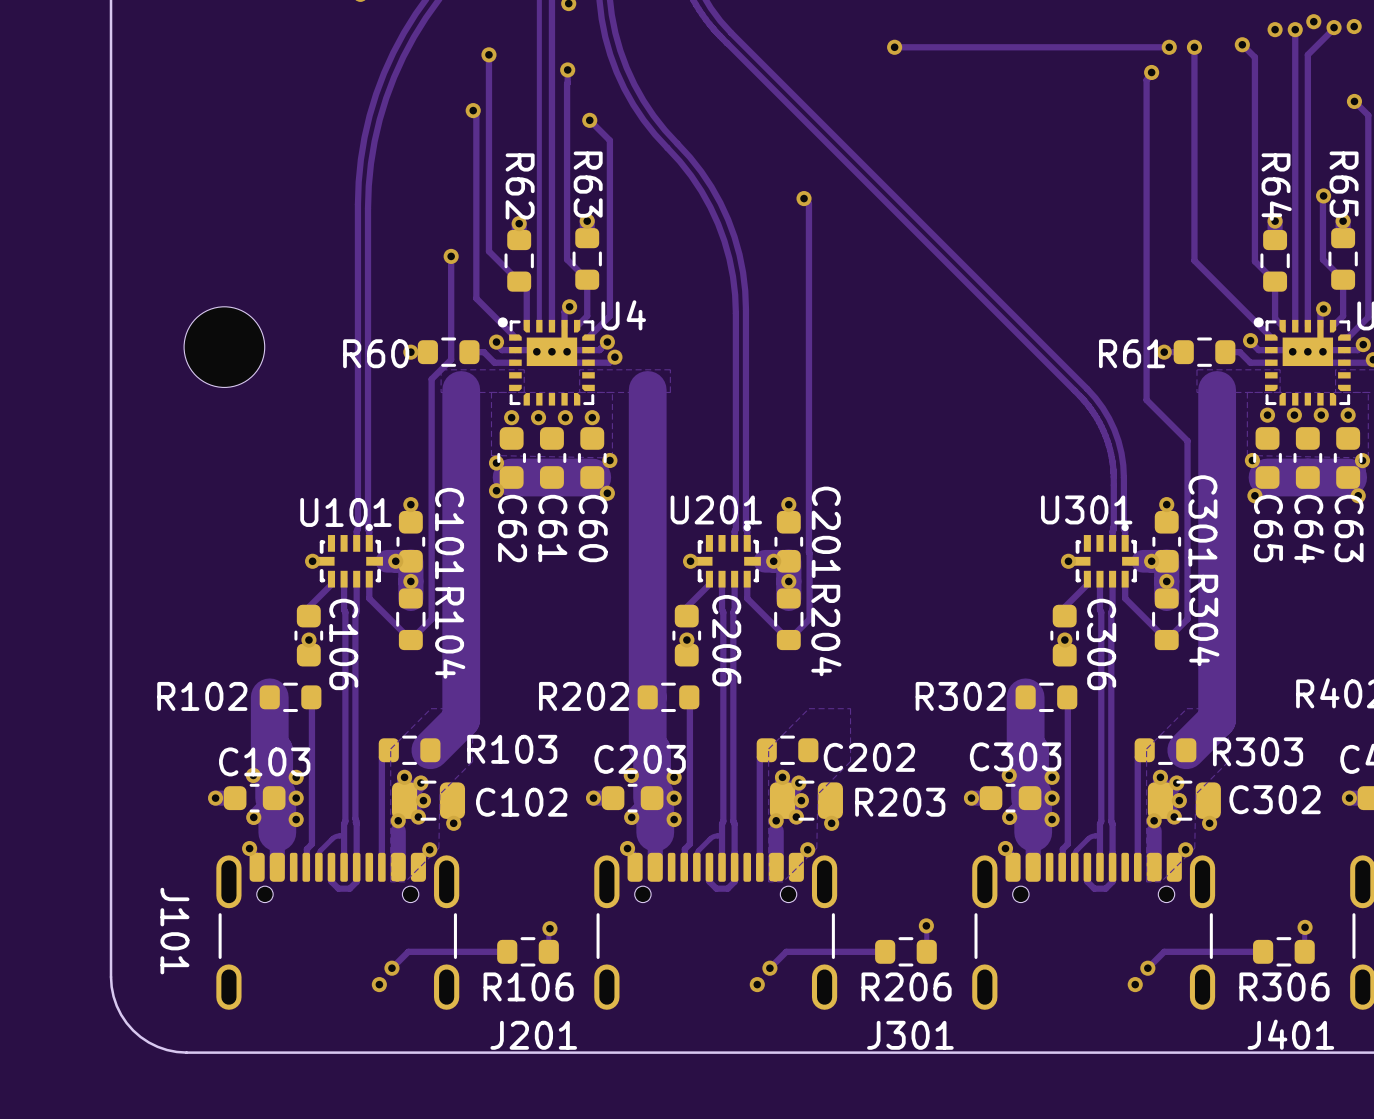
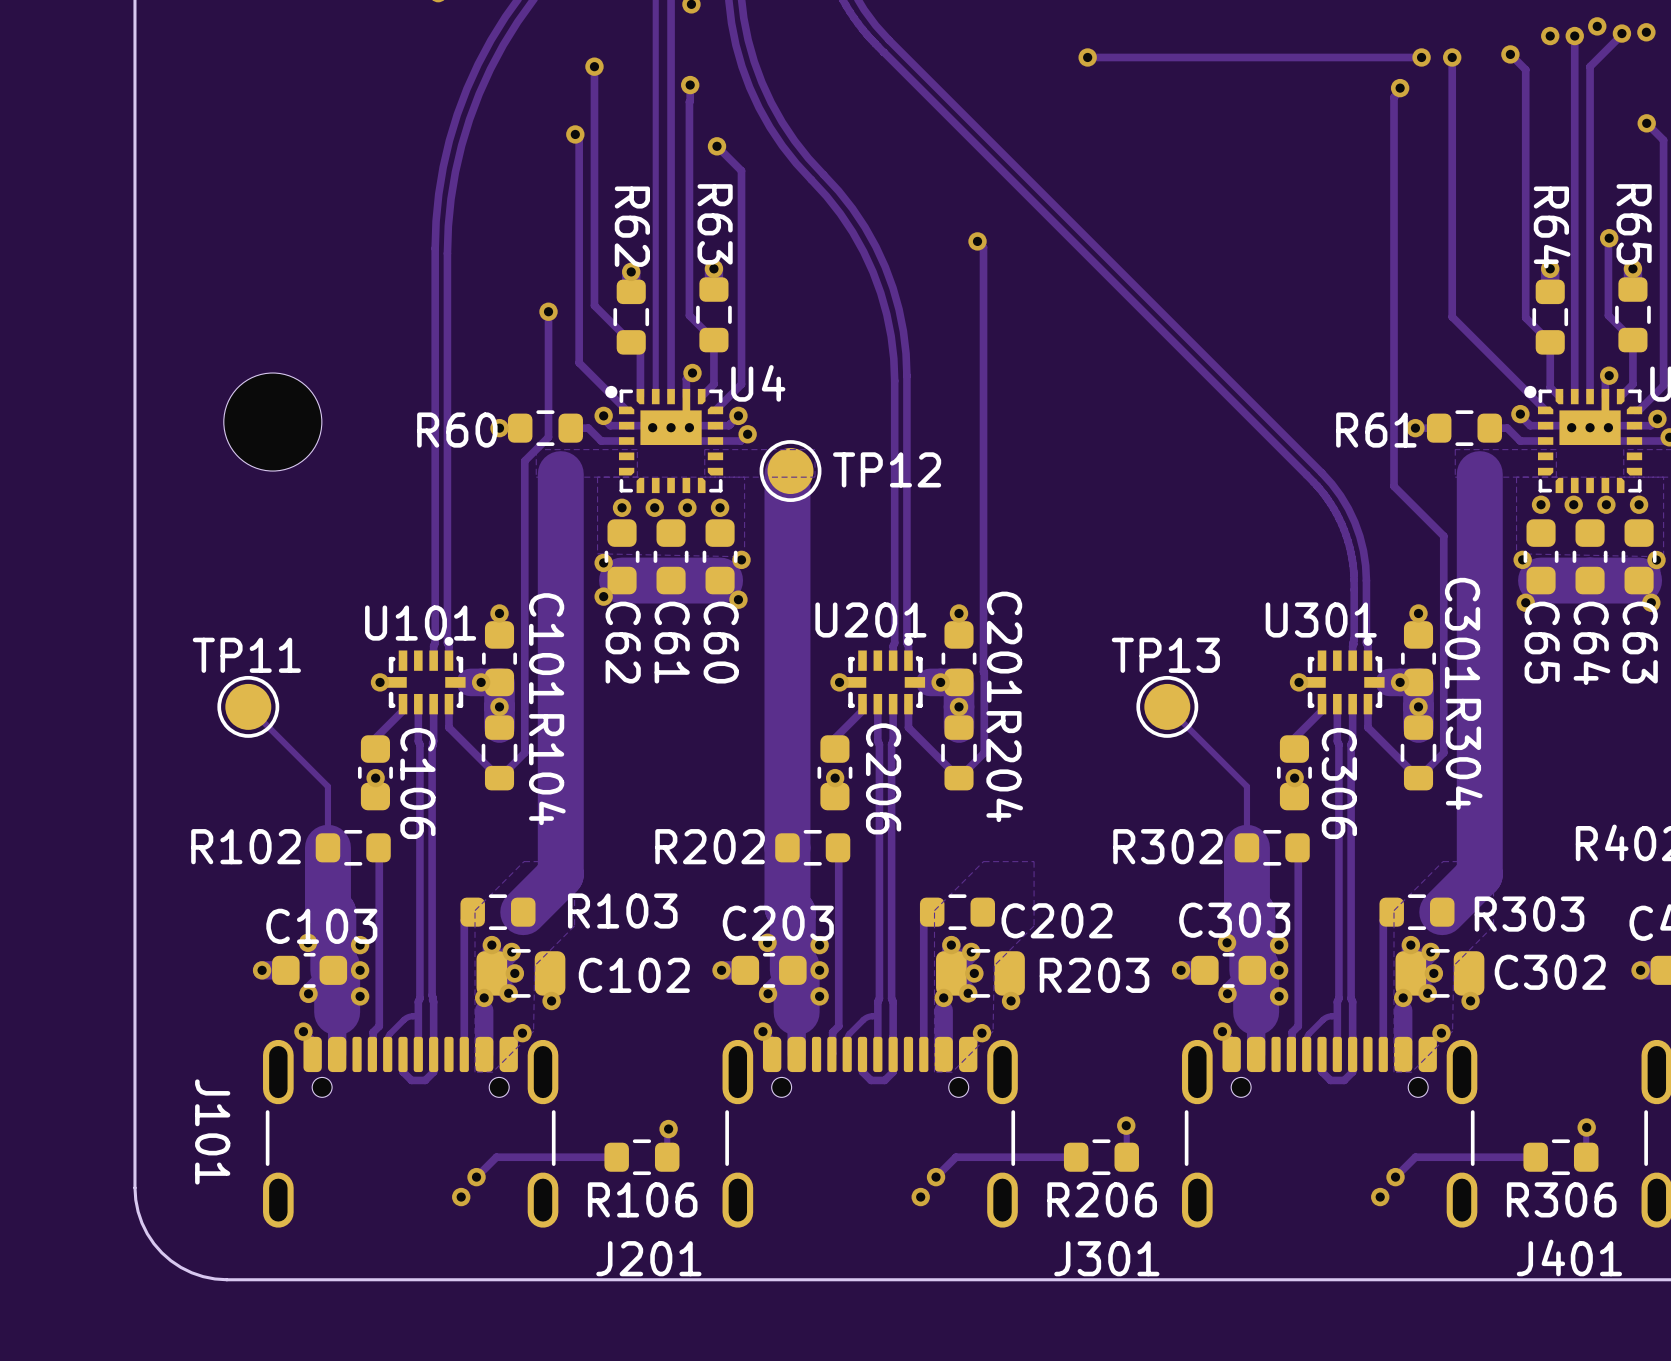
TP12: none -> (790, 471)
track: none -> (248, 706) (327, 786) (327, 847)
TP11: none -> (248, 706)
track: none -> (1167, 706) (1246, 786) (1246, 847)
TP13: none -> (1167, 706)

